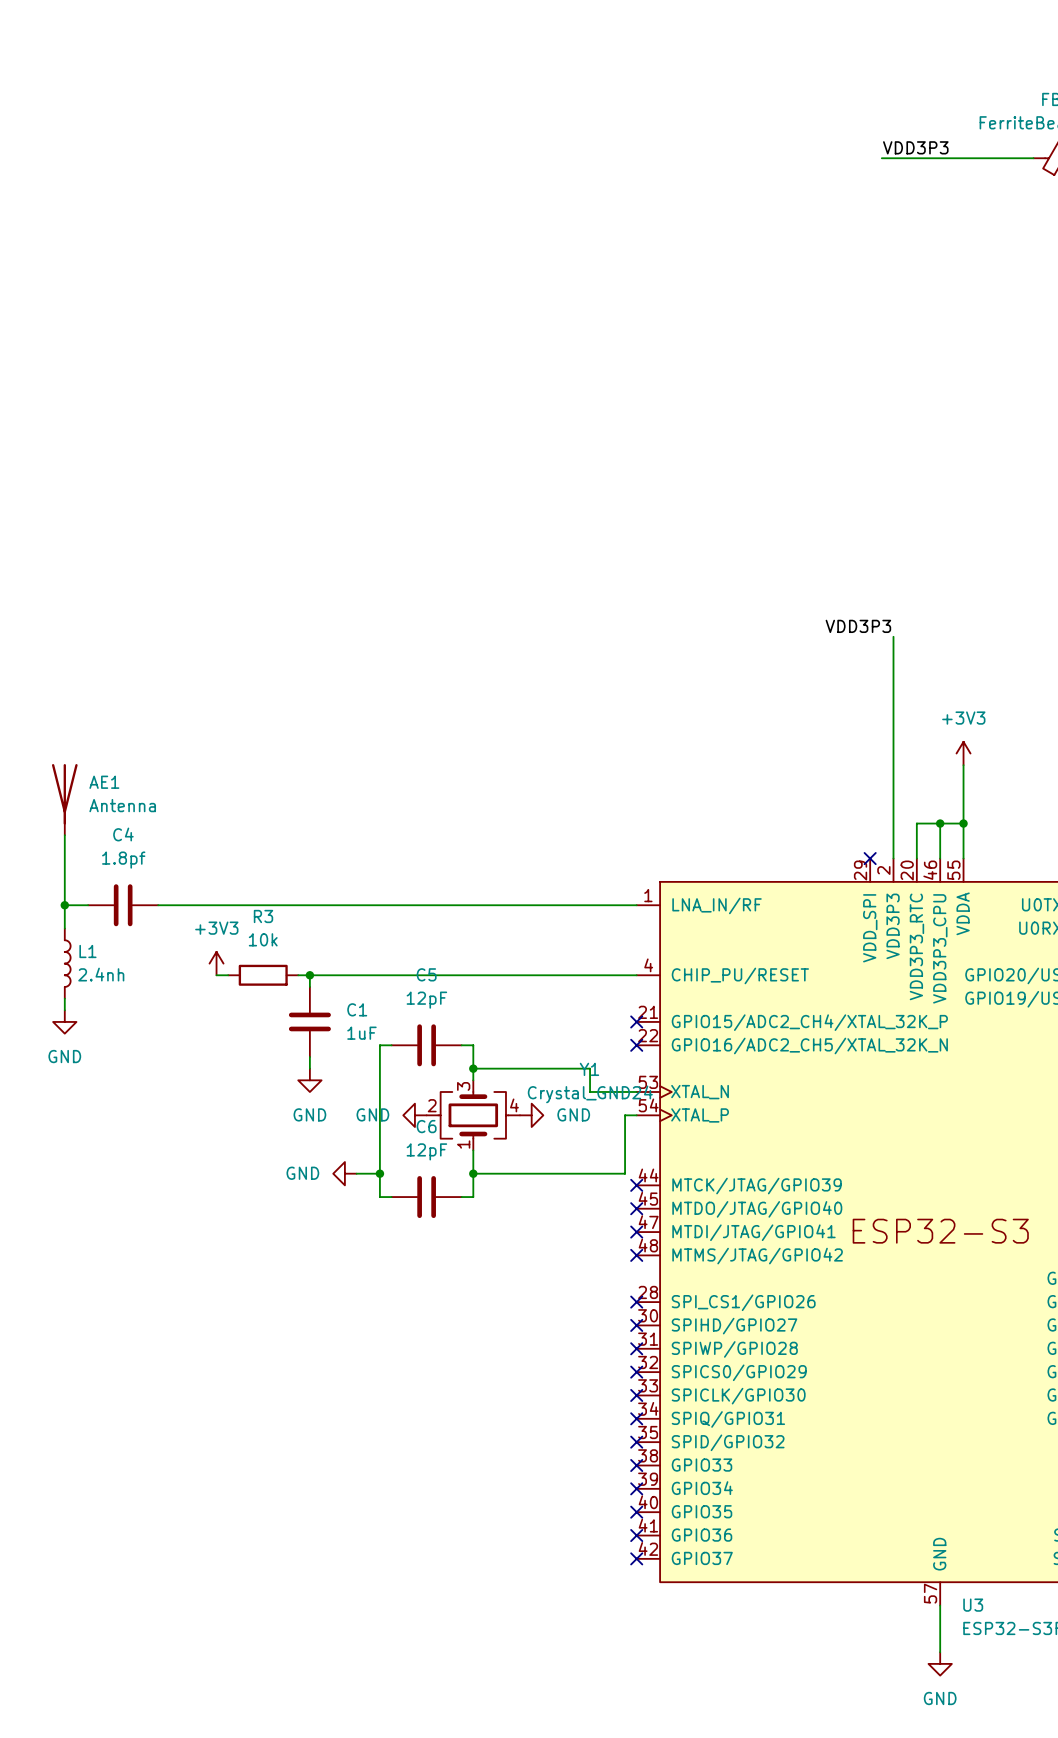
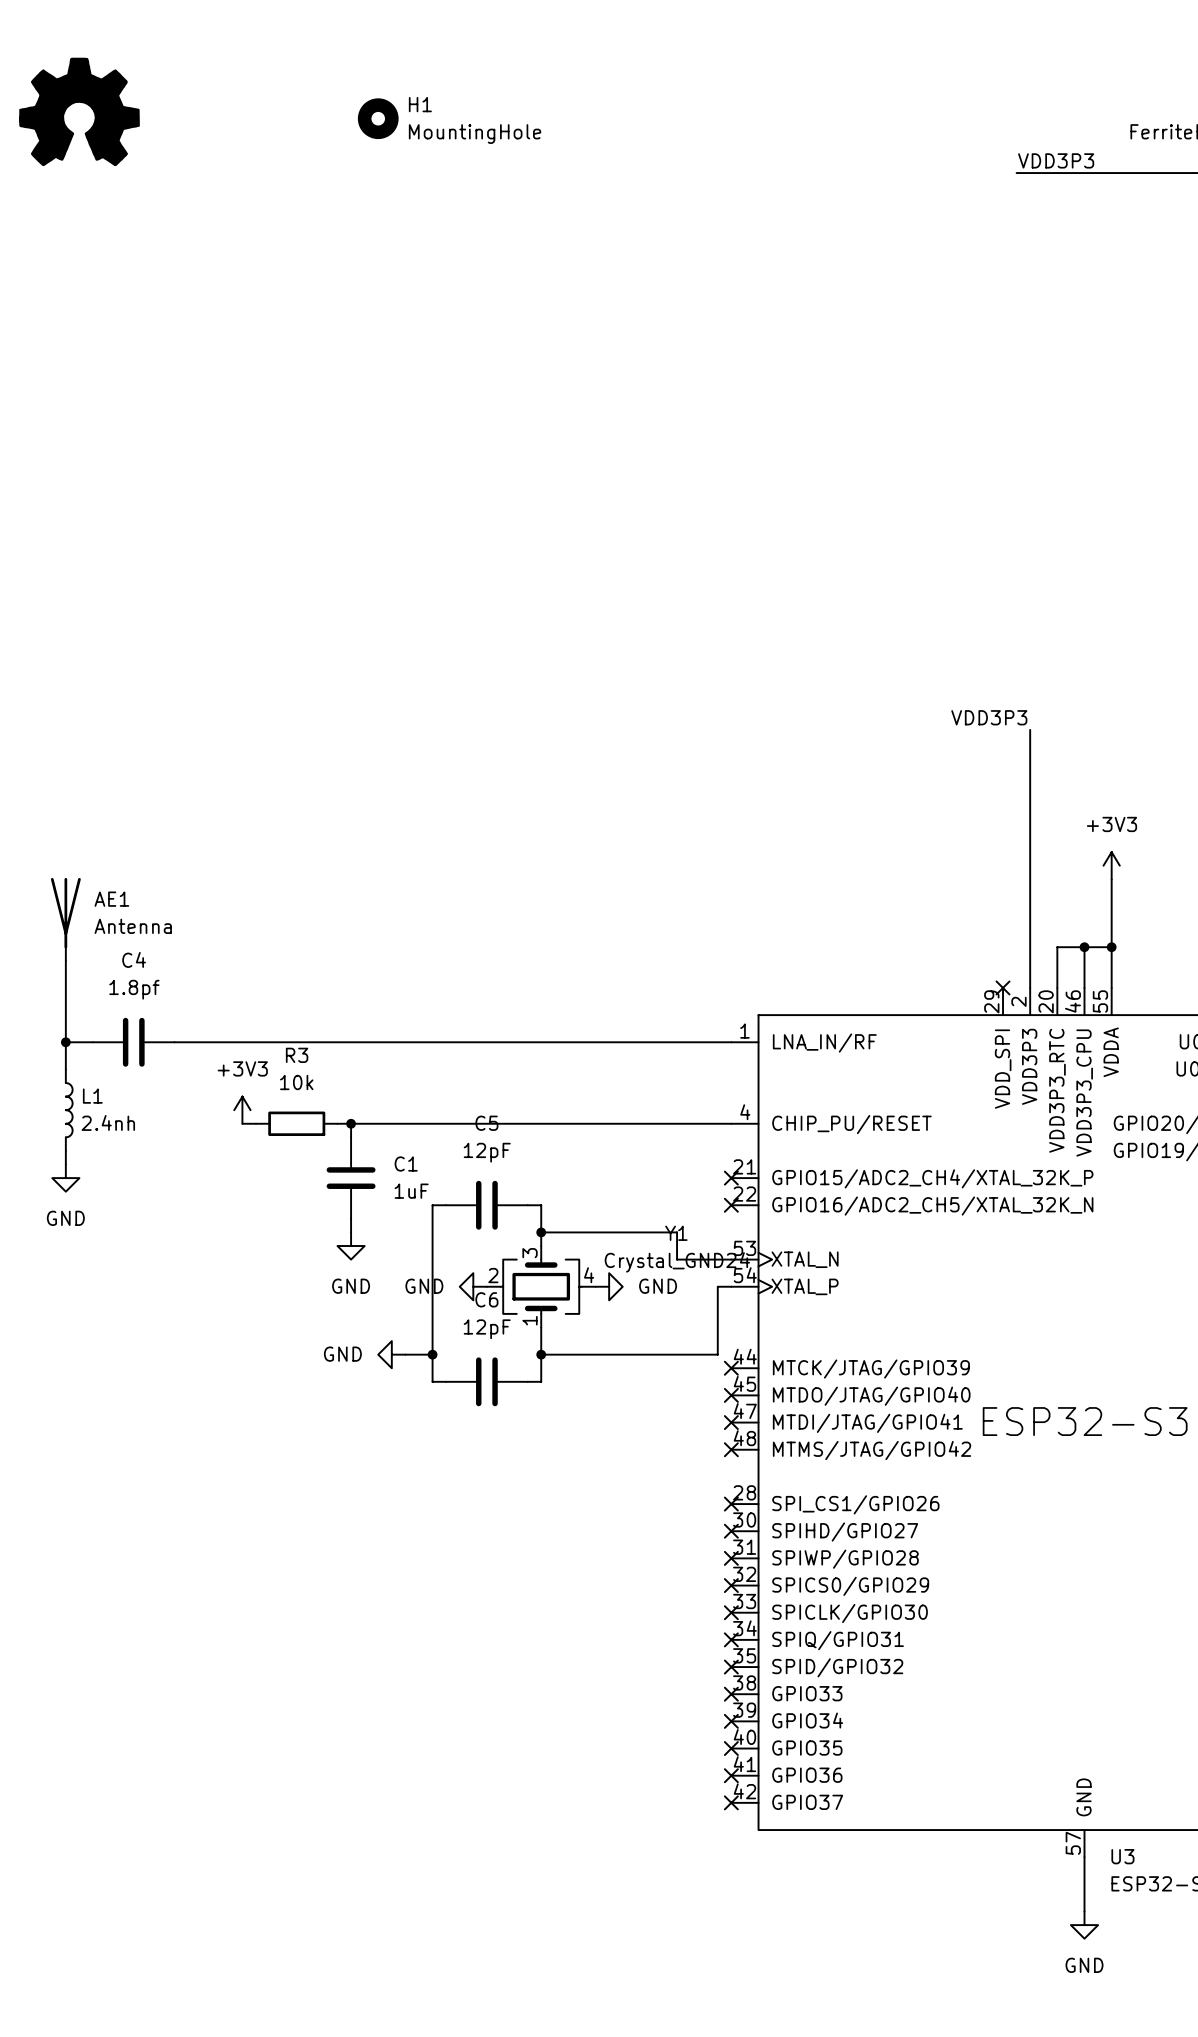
power symbol: none -> (79, 111)
H1: none -> MountingHole (378, 118)

